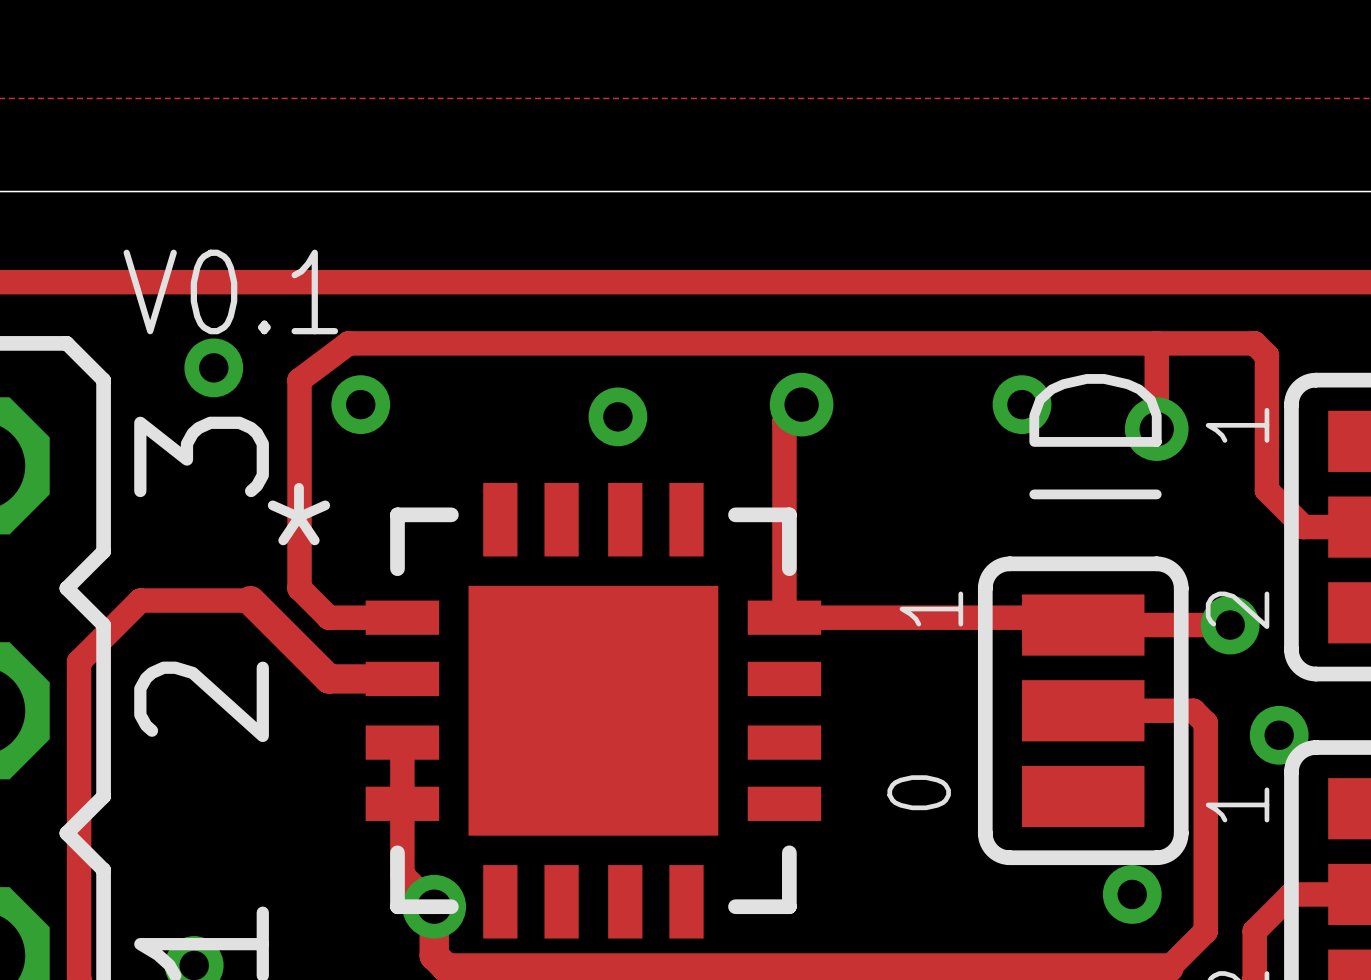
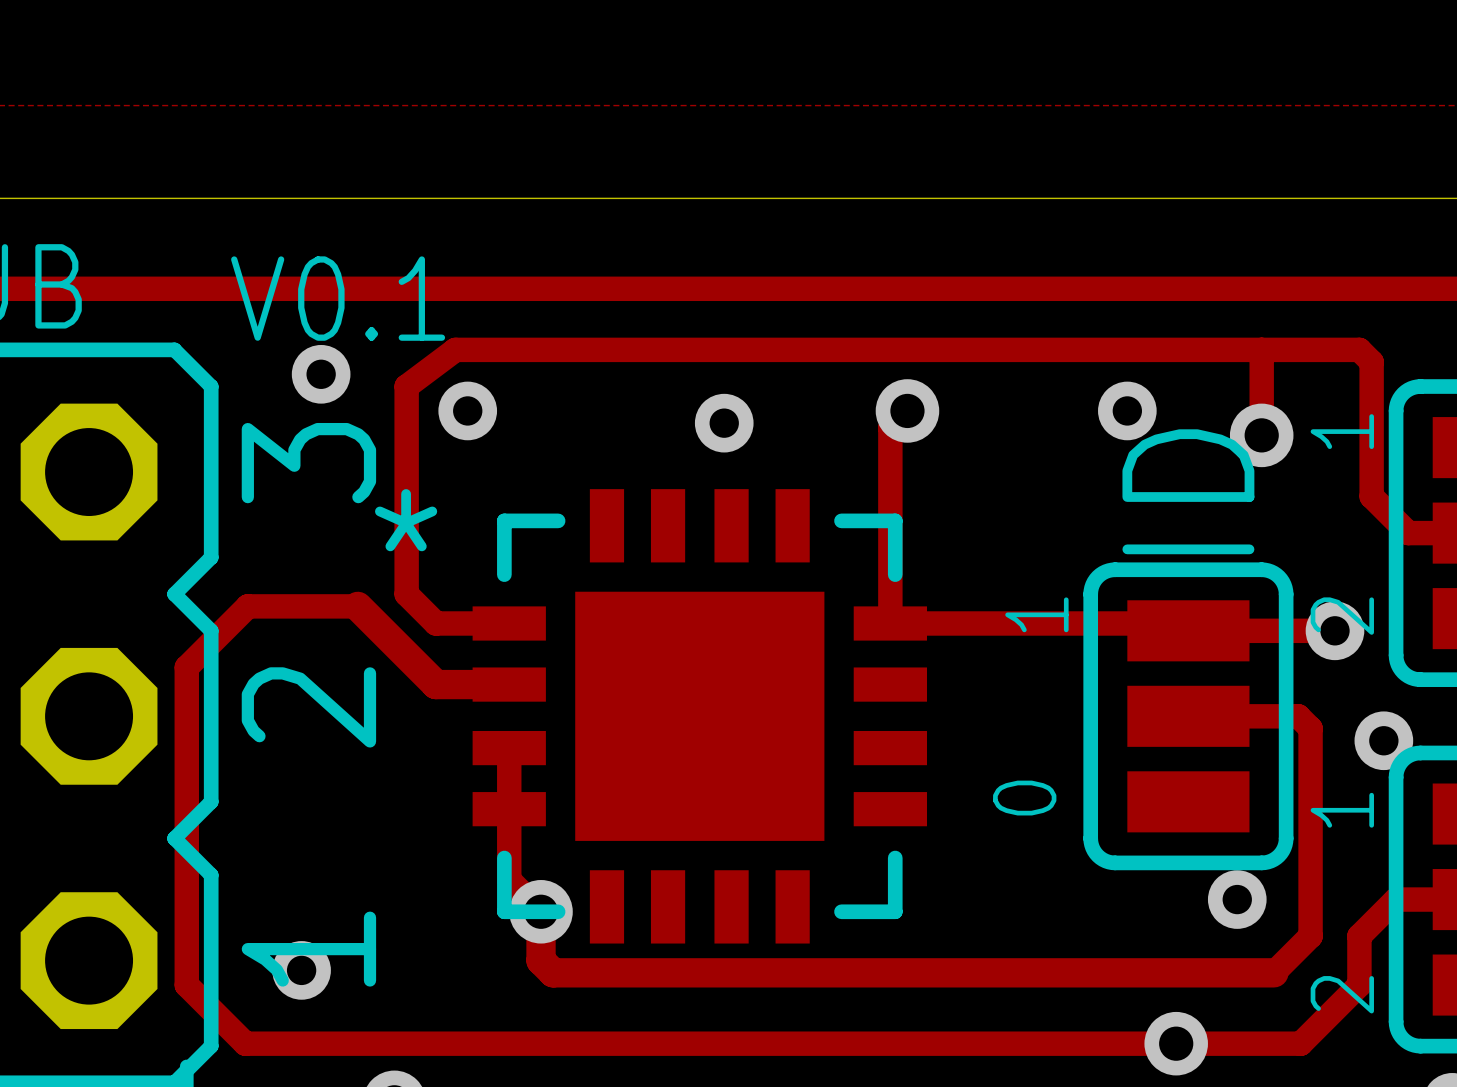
text position: ID (1095, 436) -> ID (1188, 491)

